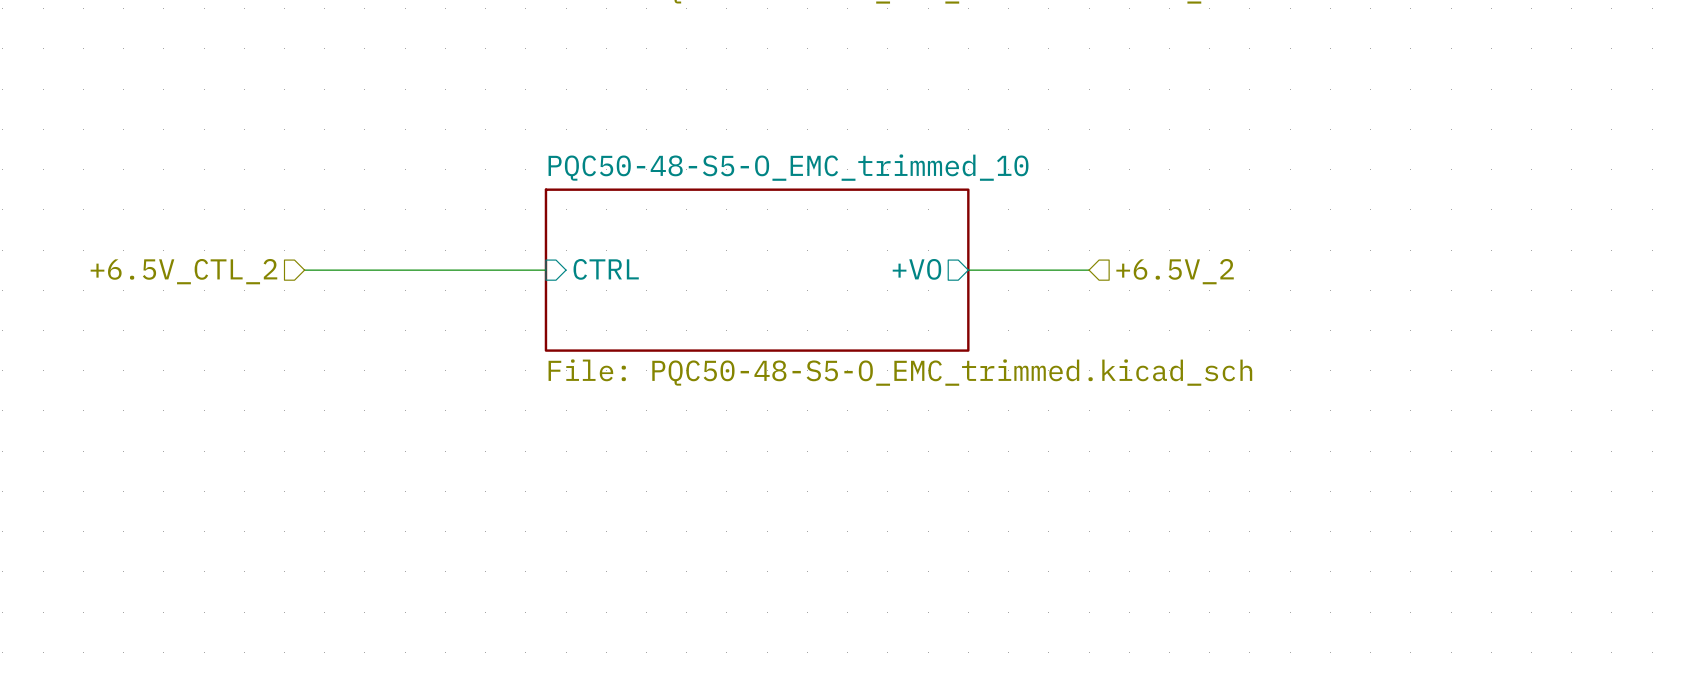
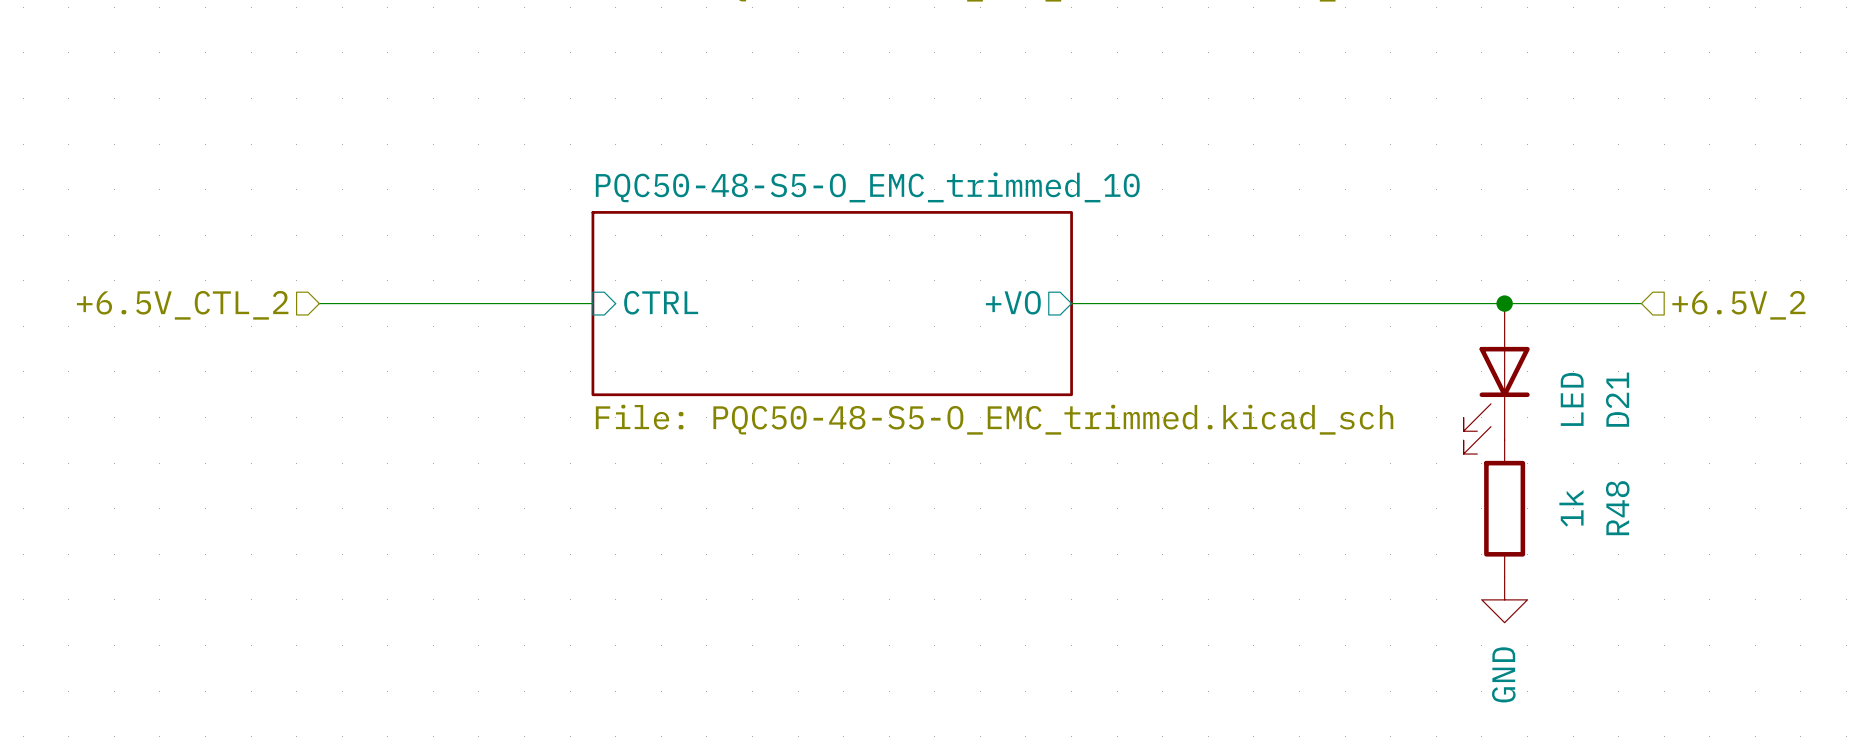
wire: none -> (1208, 303) (1641, 303)
junction: none -> (1504, 303)
hierarchical label position: +6.5V_2 (1175, 271) -> +6.5V_2 (1738, 305)
D21: none -> LED (1496, 378)
R48: none -> 1k (1504, 508)
power symbol: none -> GND (1504, 599)

